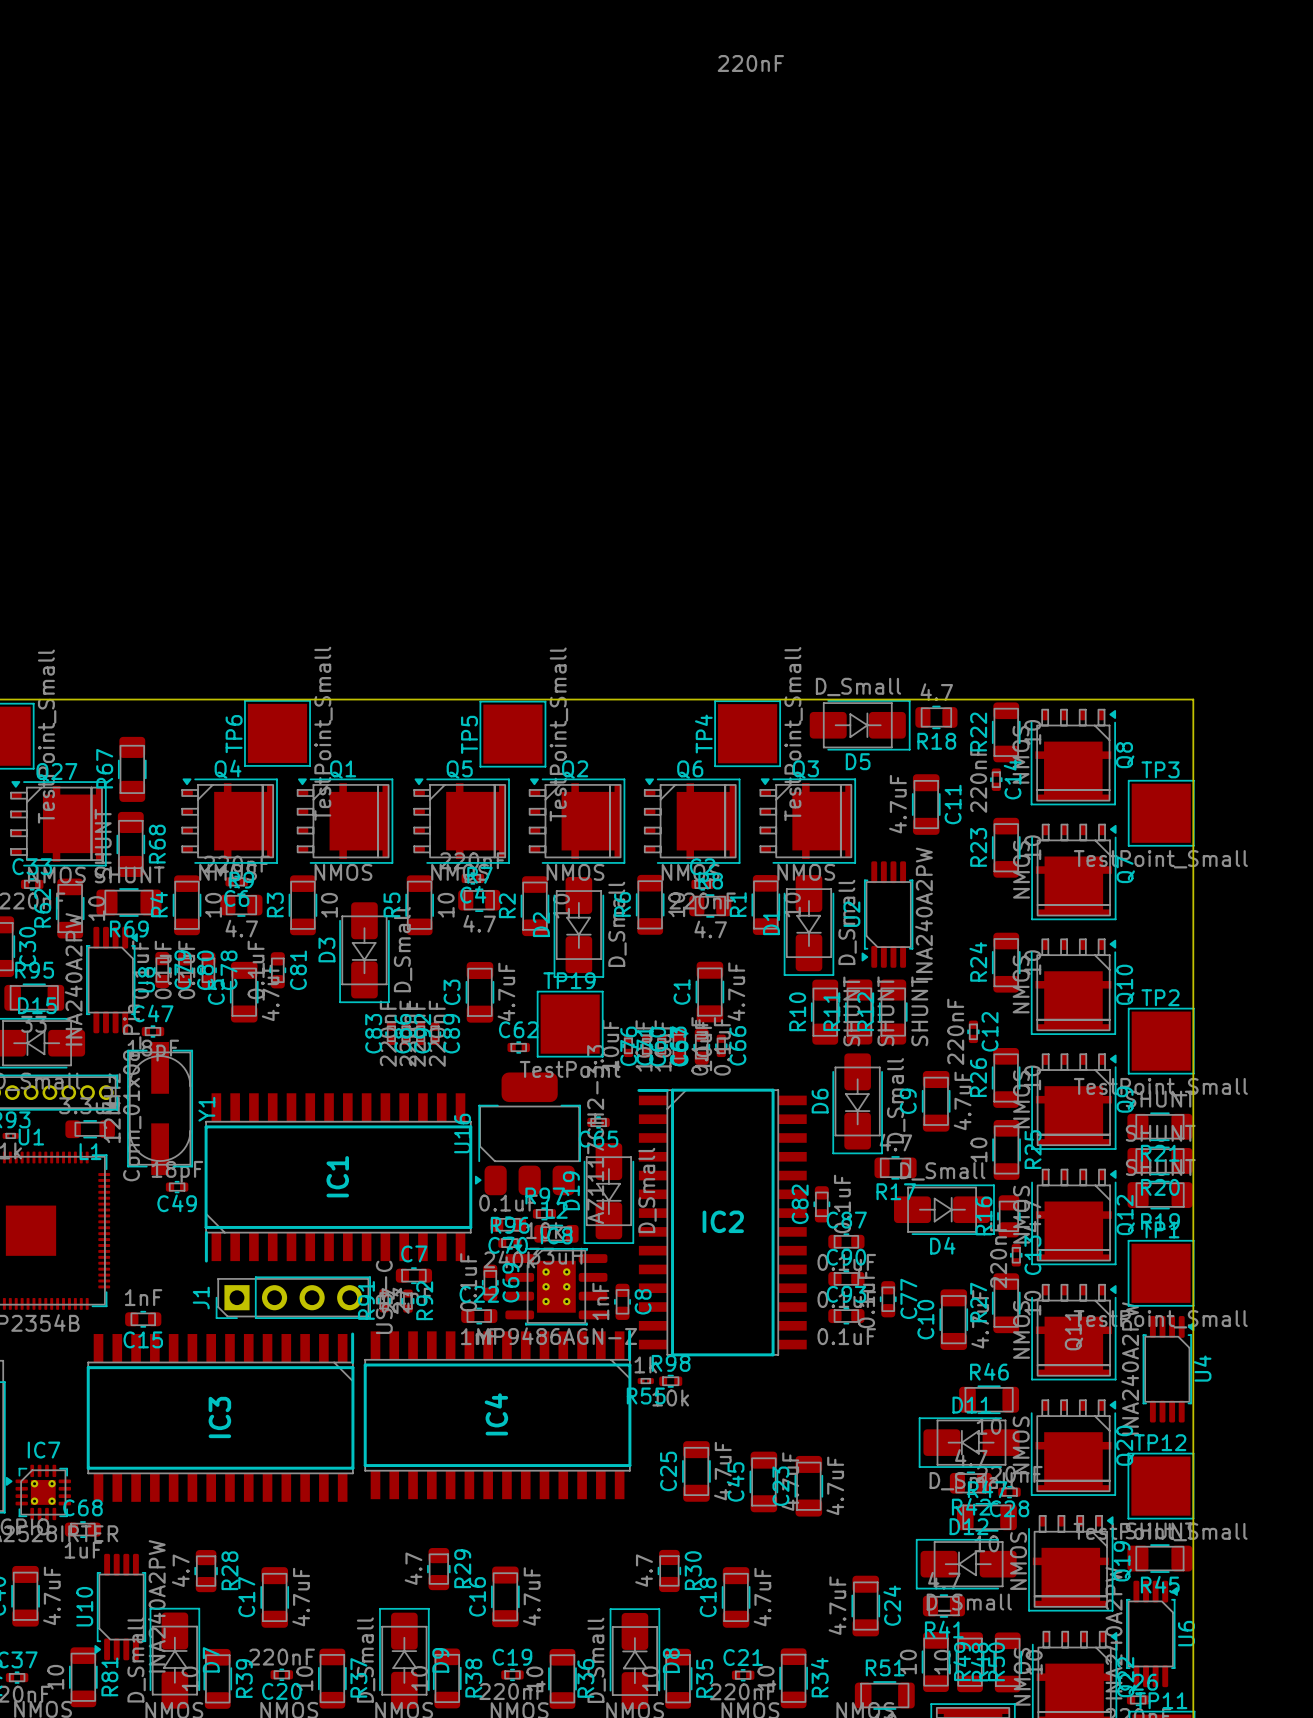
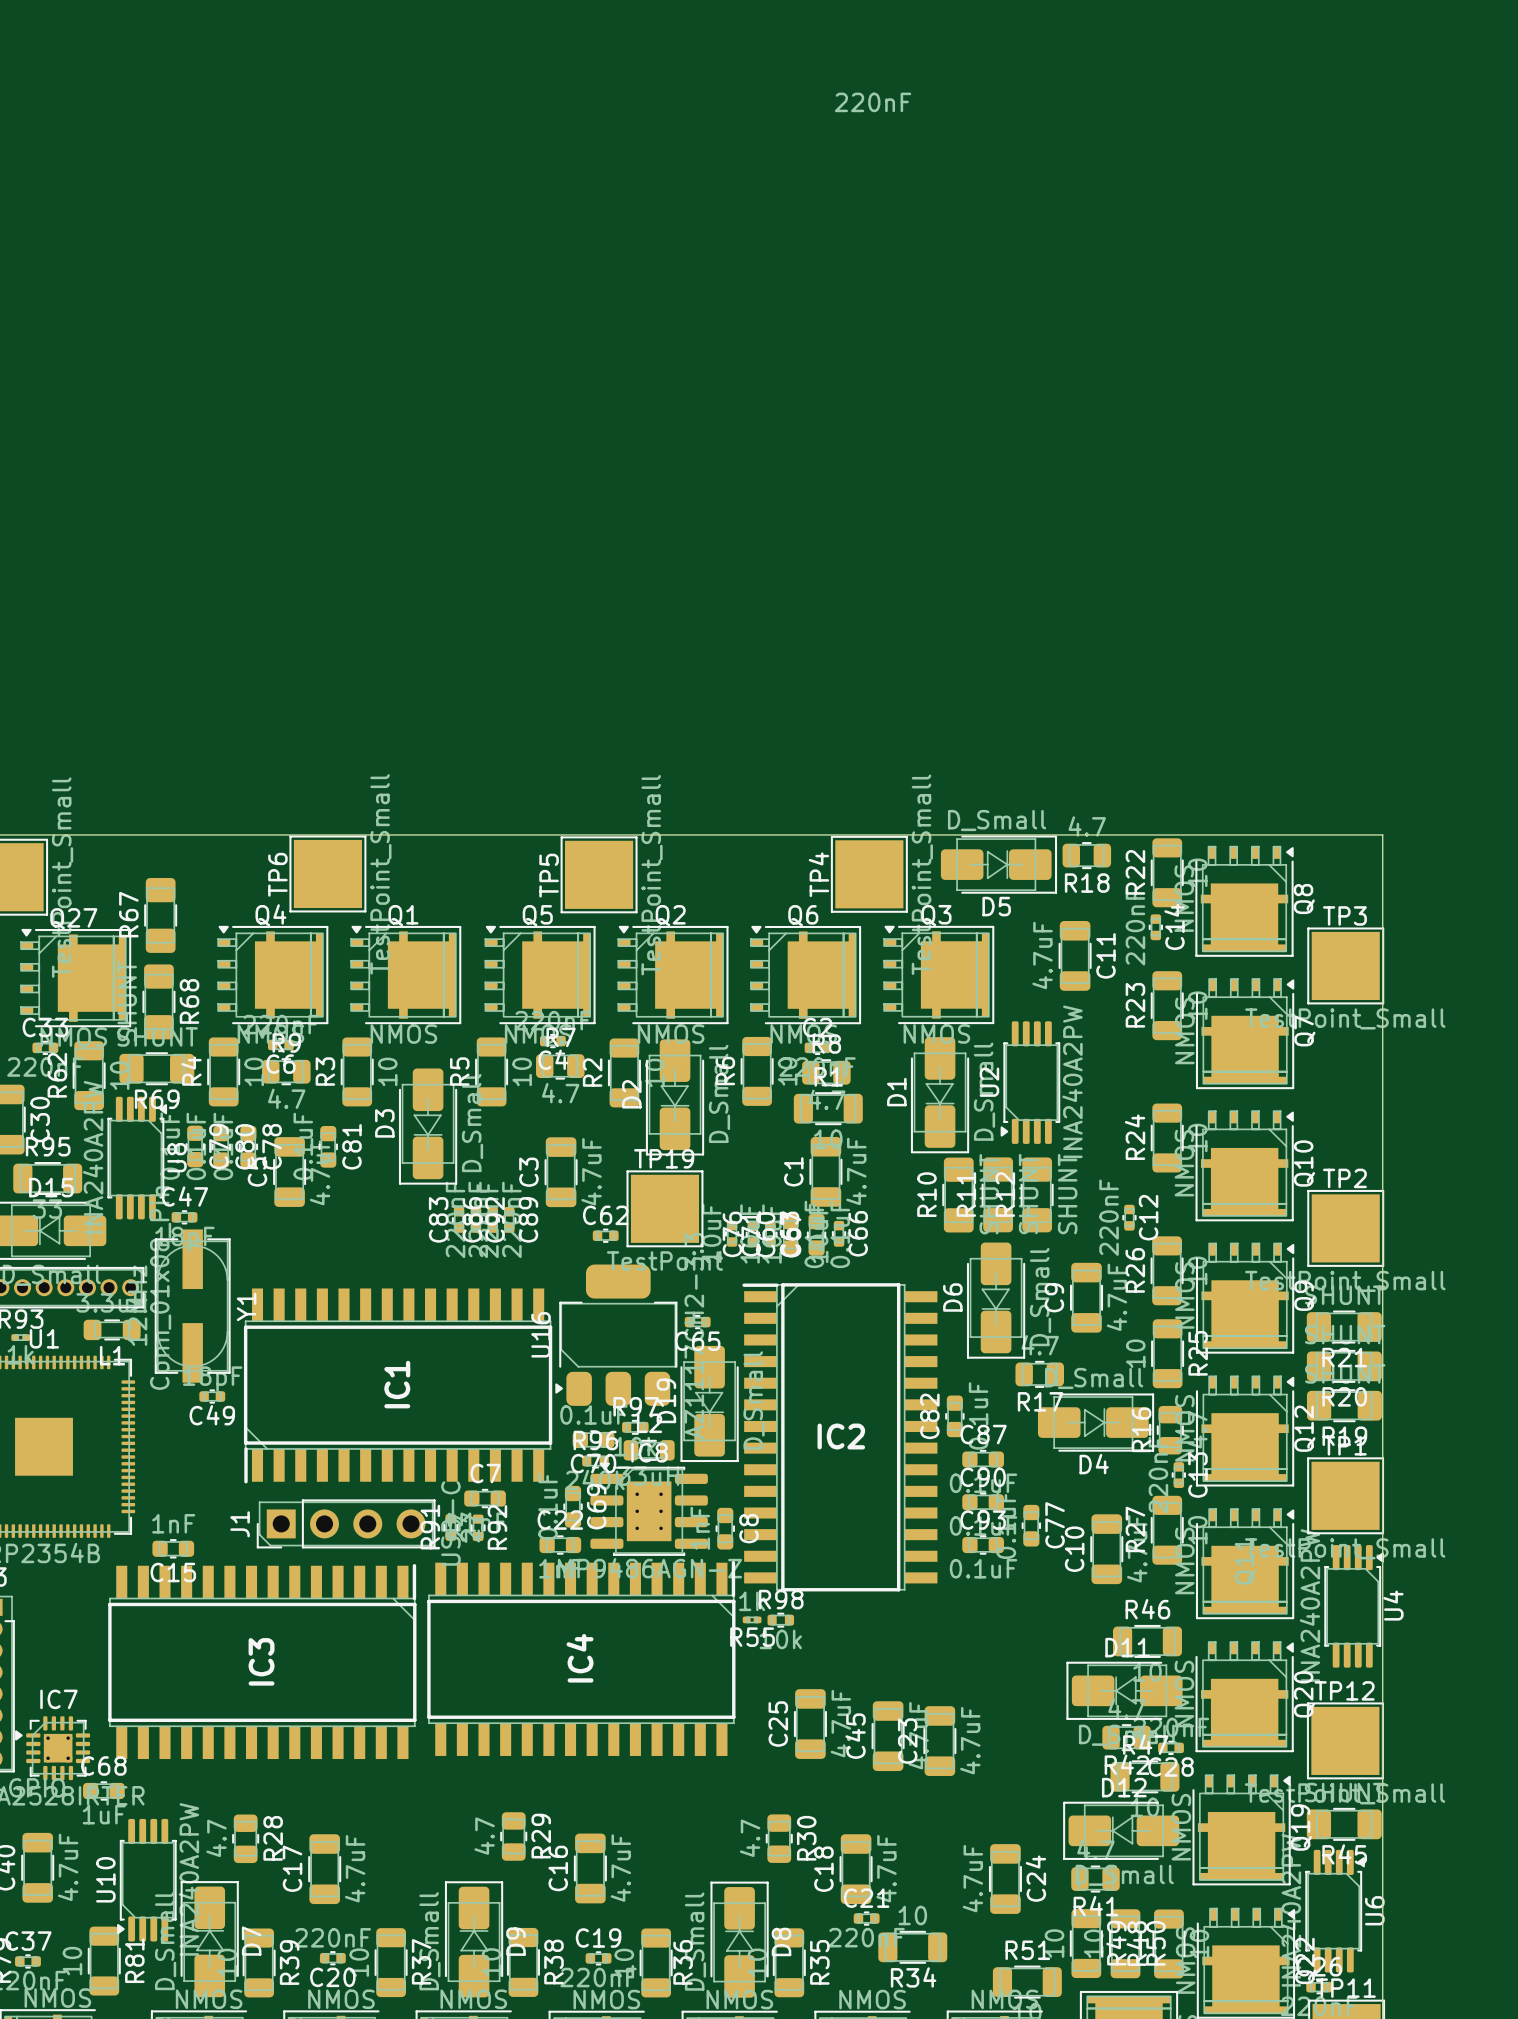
R1 rotation: 0° (765, 904) -> 90° clockwise (828, 1108)
R1 position: (765, 904) -> (828, 1108)
C21 position: (743, 1675) -> (866, 1918)
R34 rotation: 0° (793, 1678) -> 90° clockwise (912, 1947)

